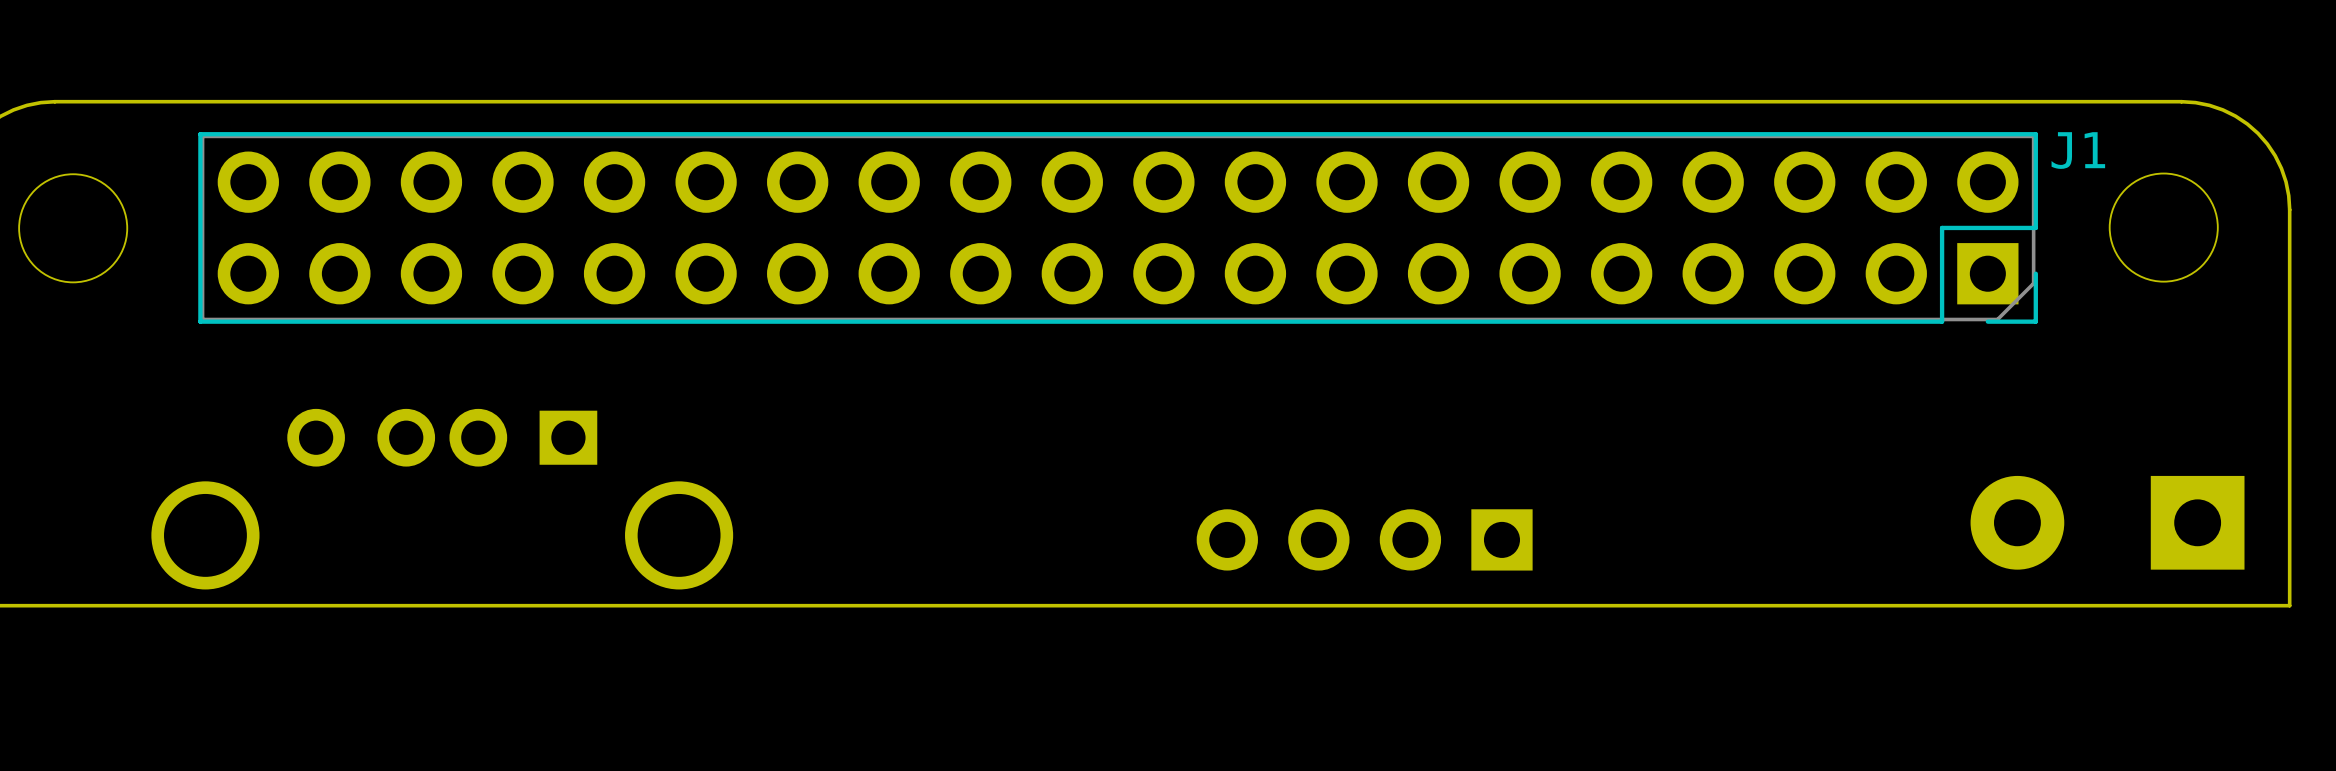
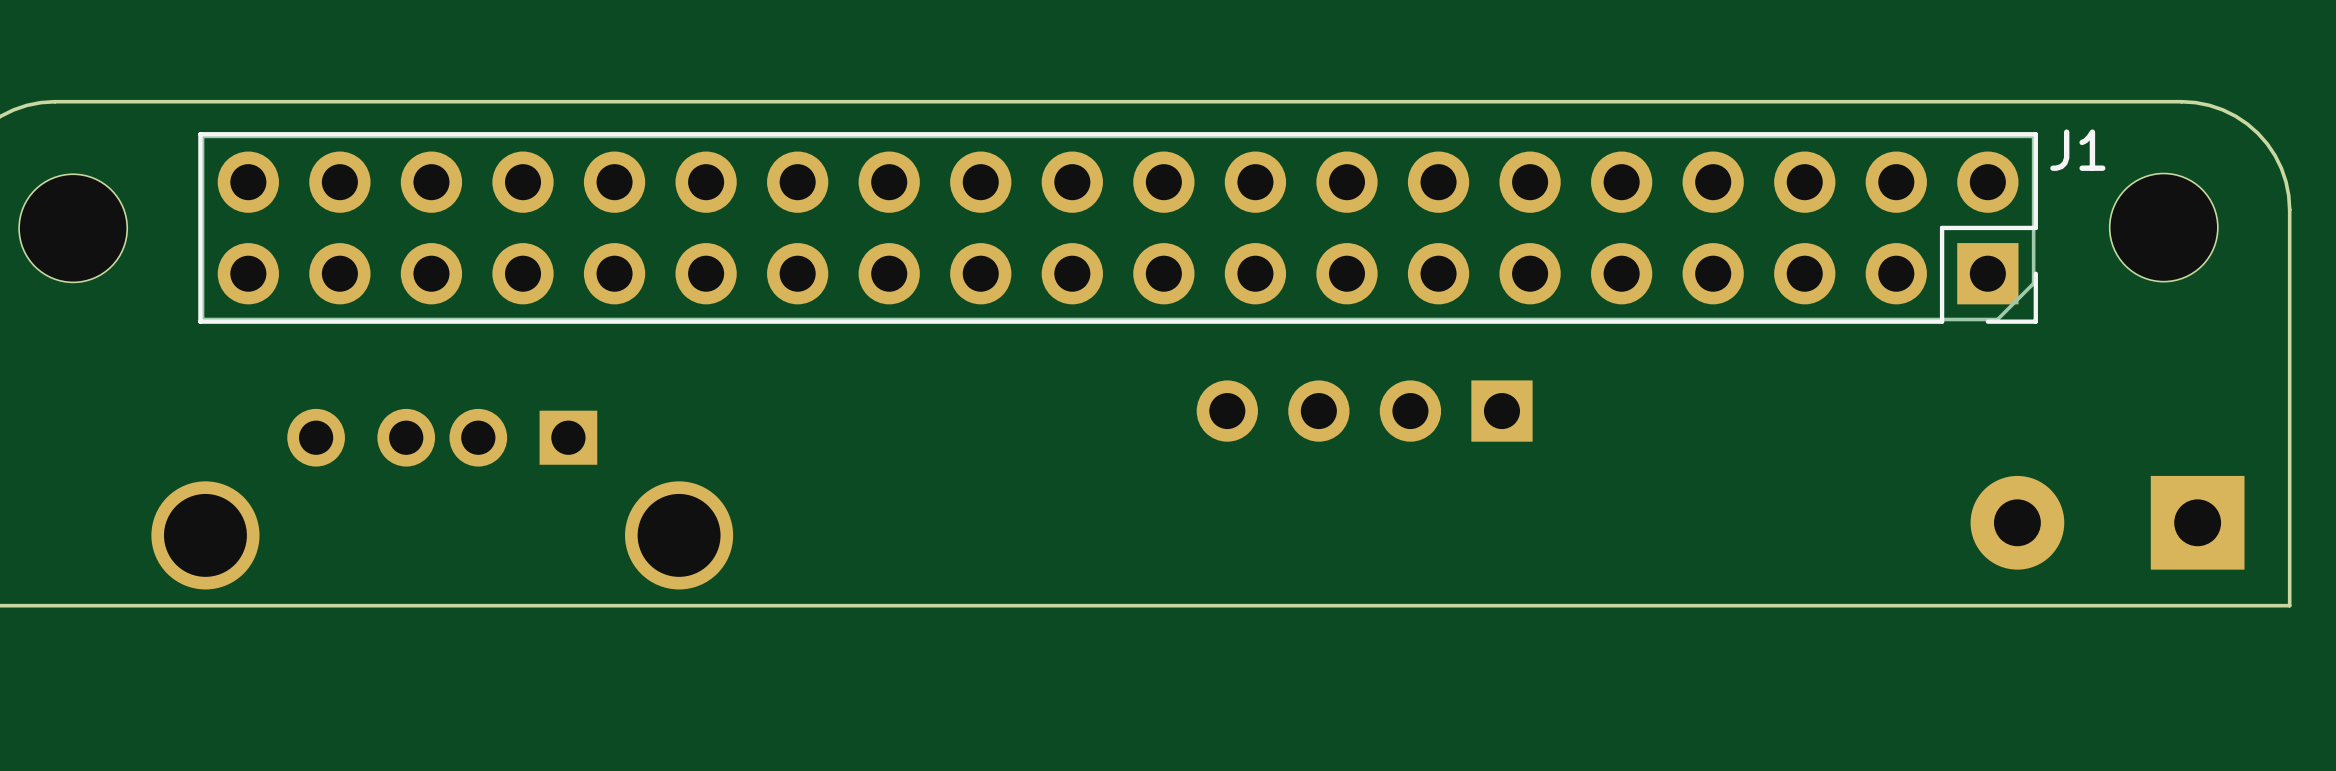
part position: (1364, 539) -> (1364, 411)

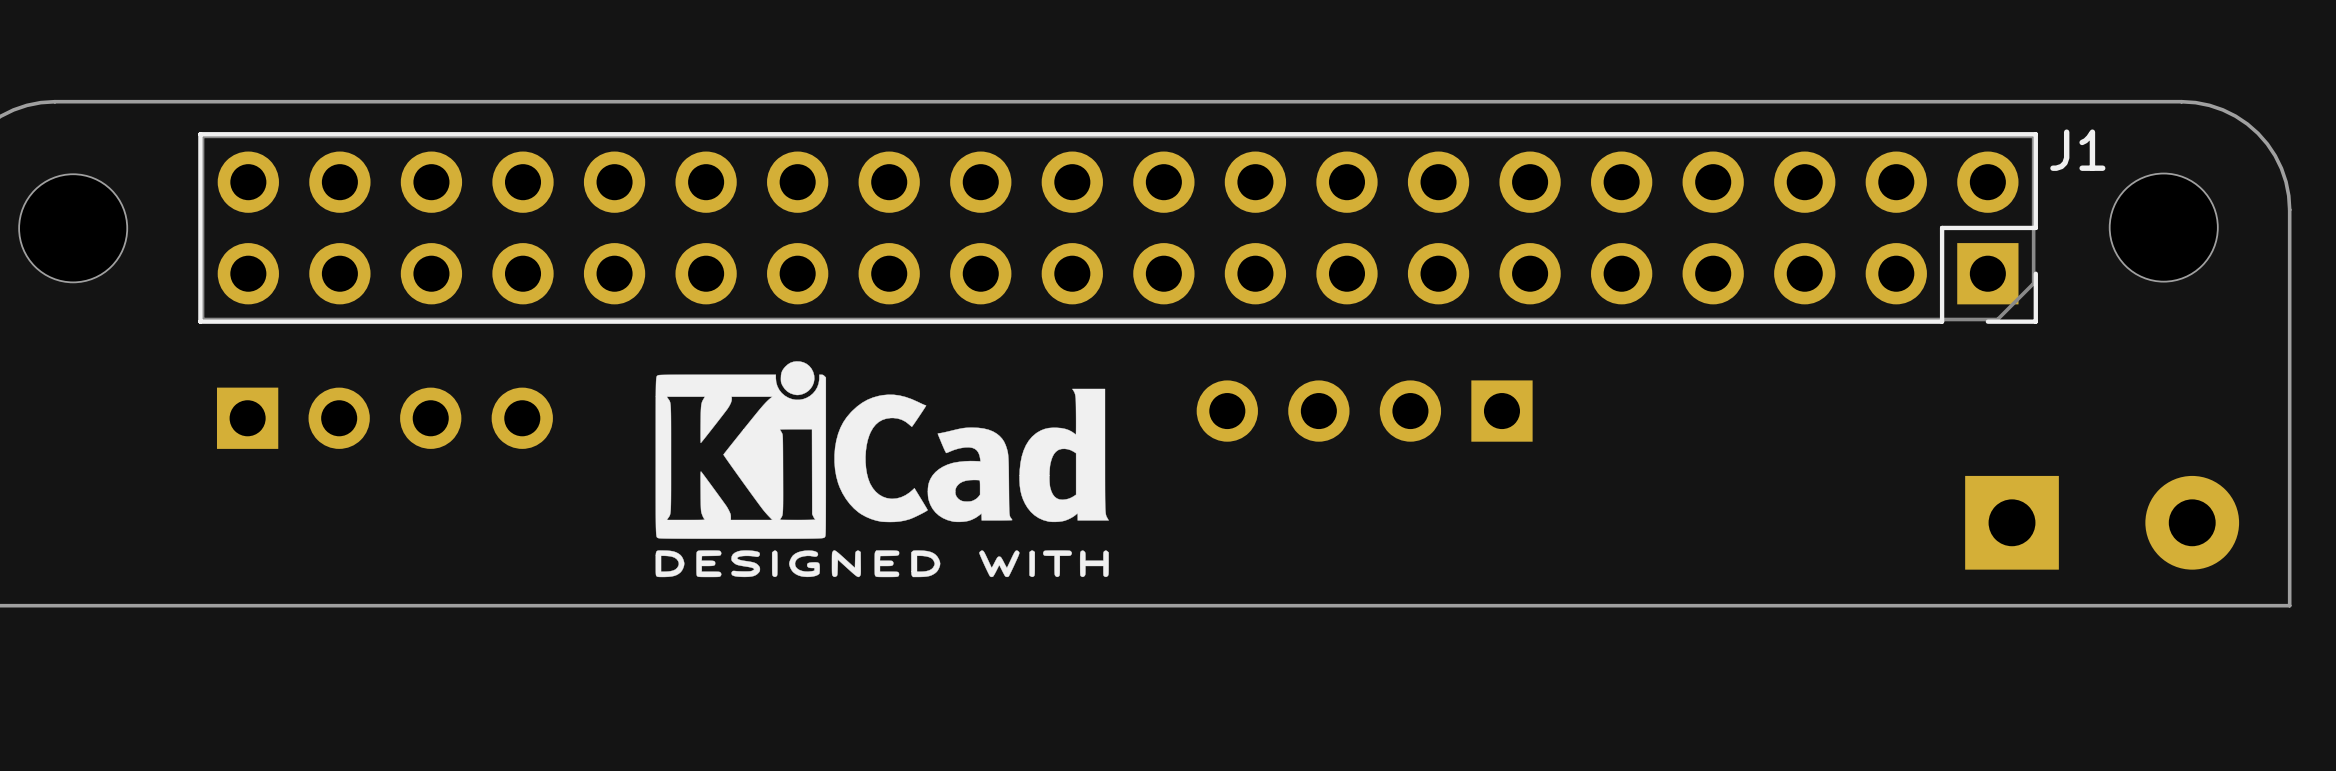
drawing: none -> [655, 361, 1109, 578]
part: none -> (384, 418)
part: (442, 499) -> none
part rotation: 0° (2107, 522) -> 180° (2102, 522)

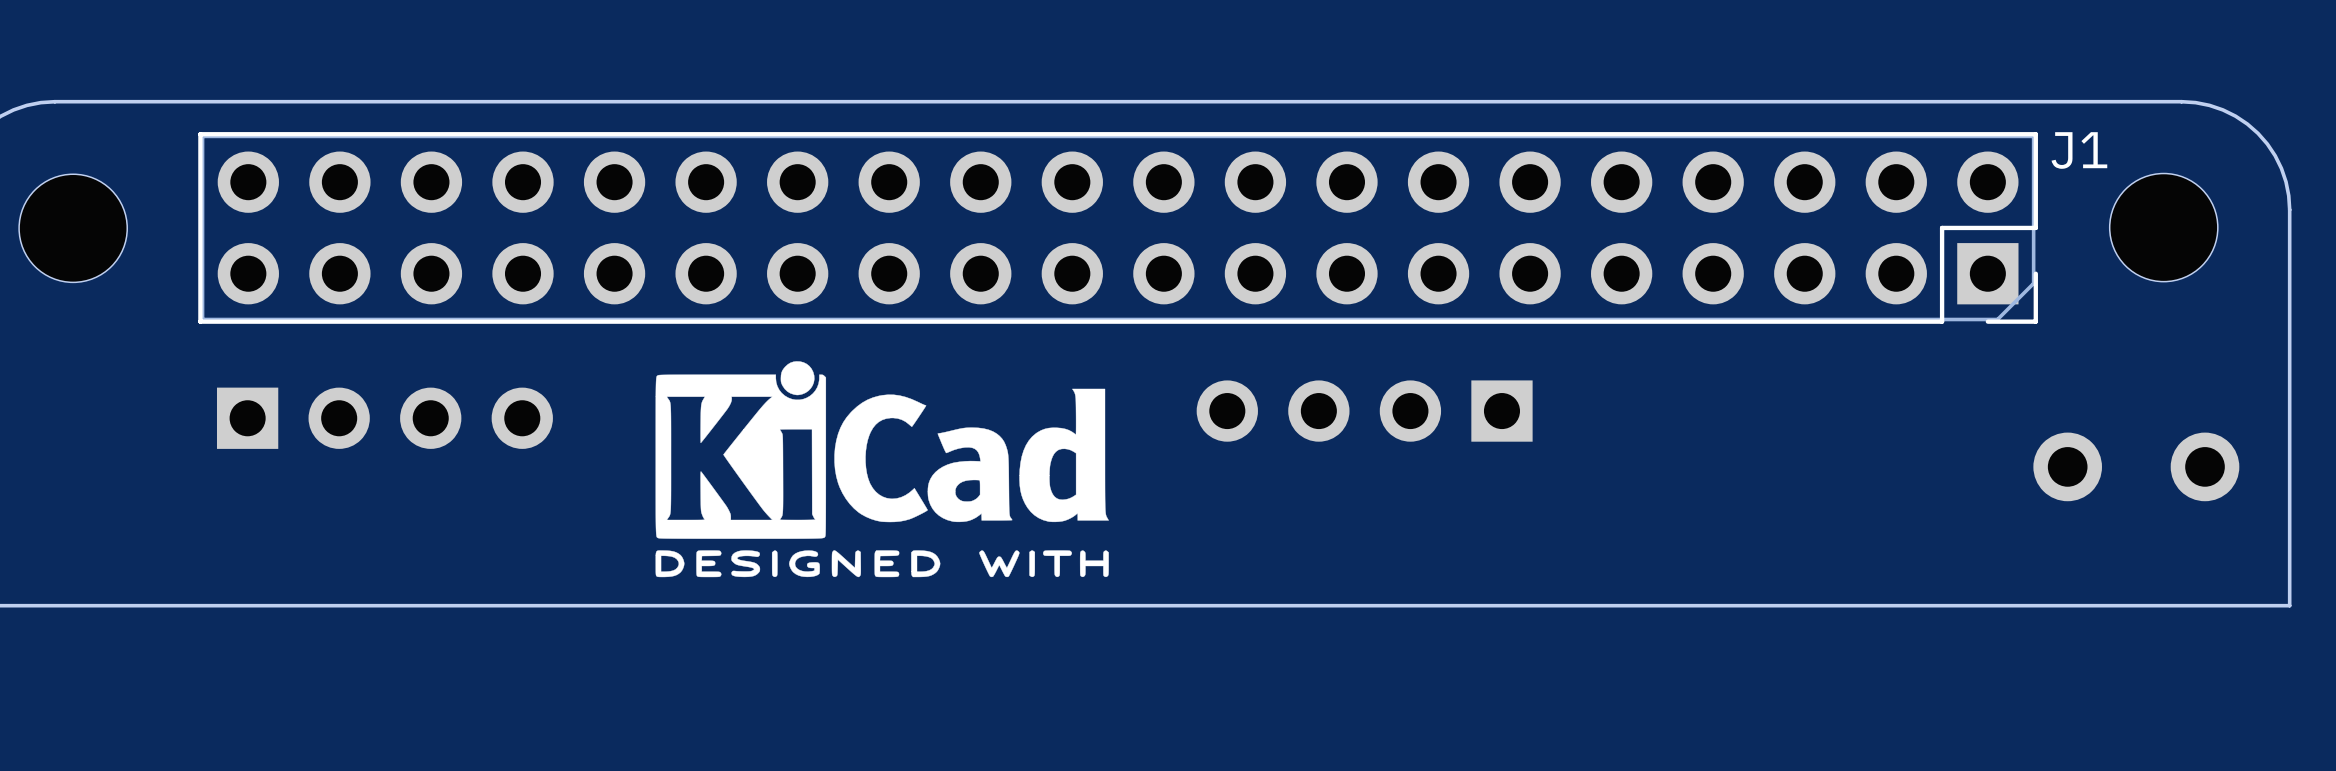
part: none -> (2136, 466)
part: (2102, 522) -> none

